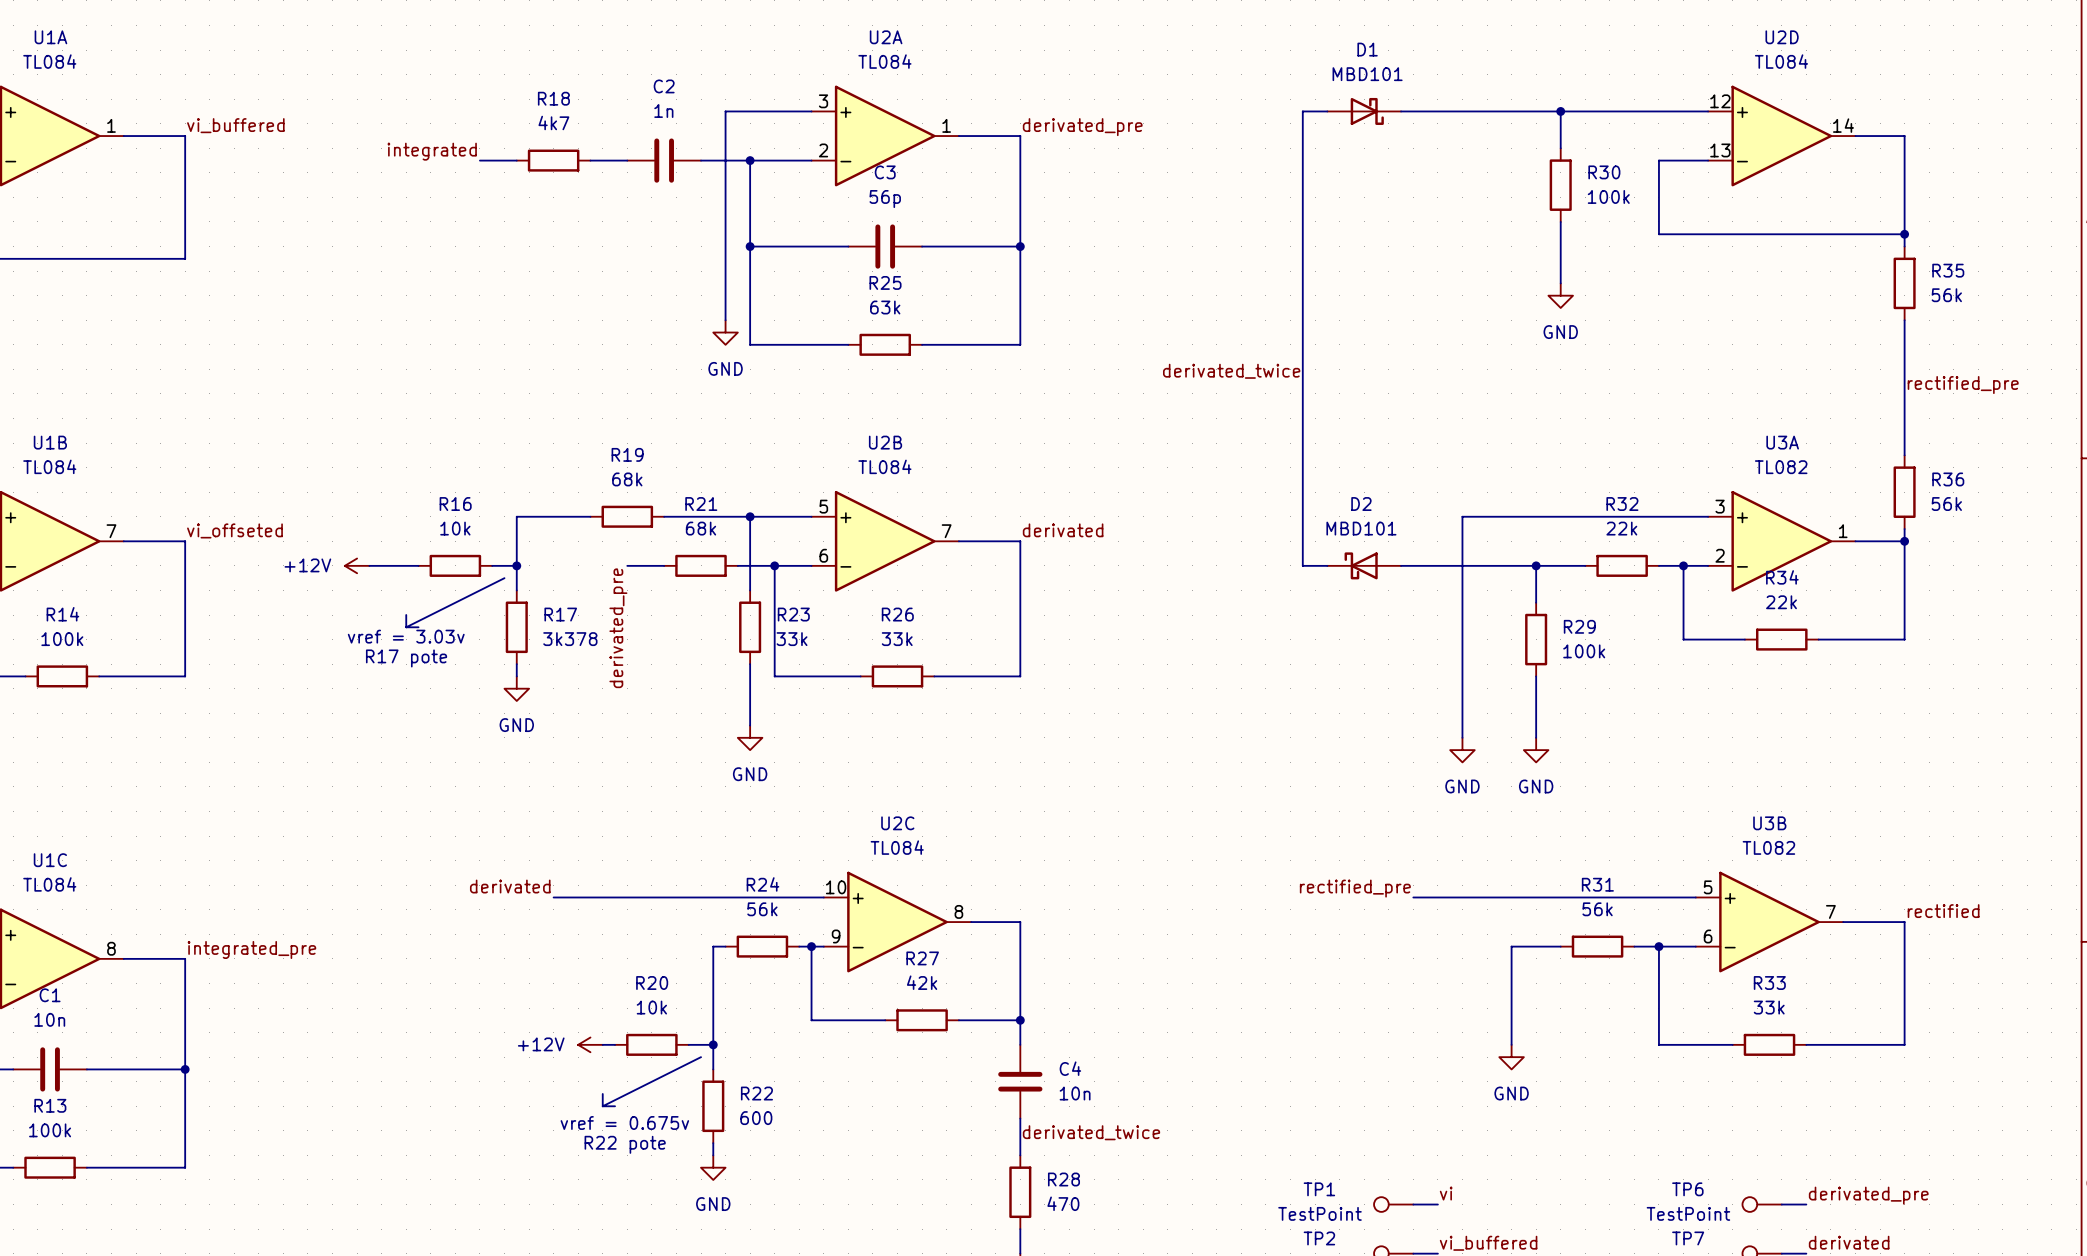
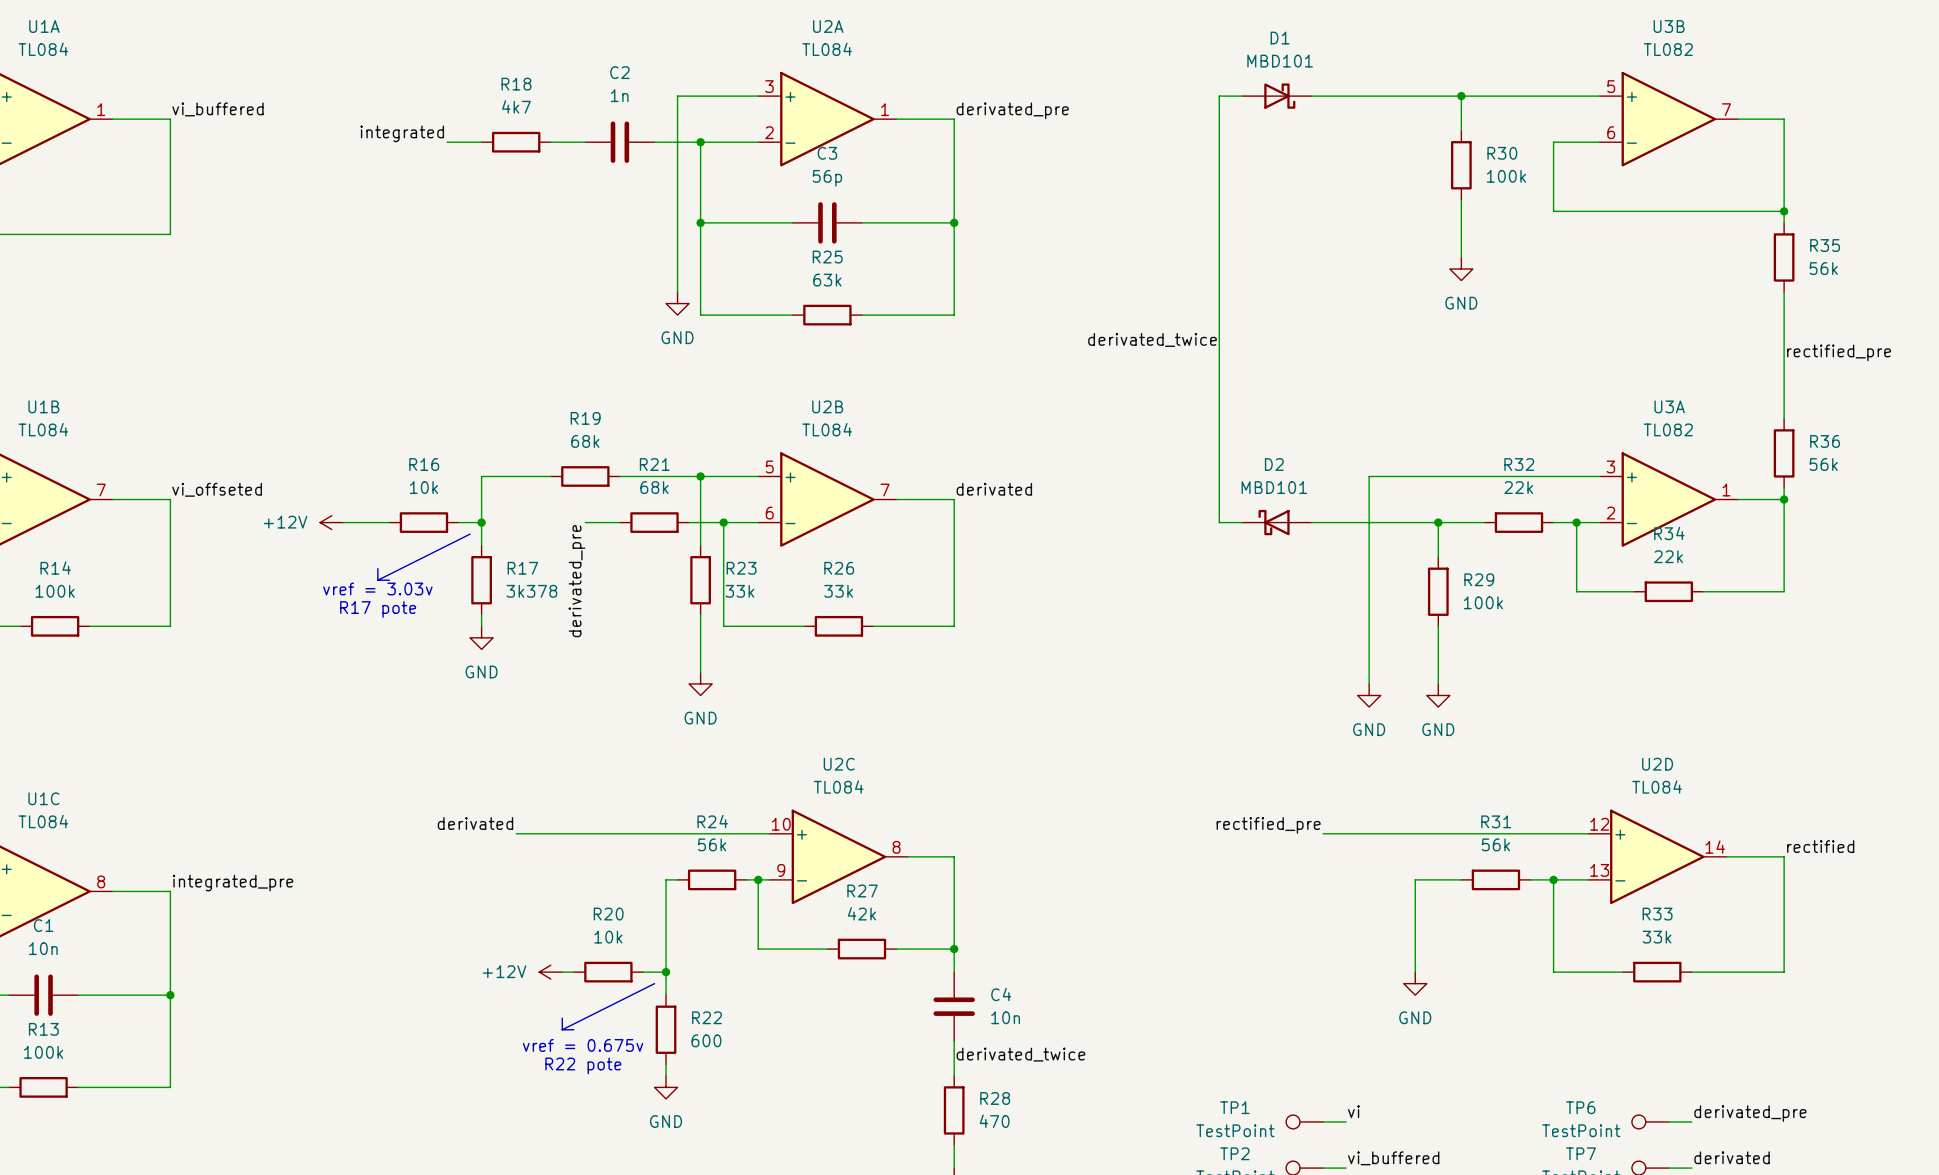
U2D position: (1781, 136) -> (1657, 856)
U3B position: (1769, 922) -> (1668, 119)

